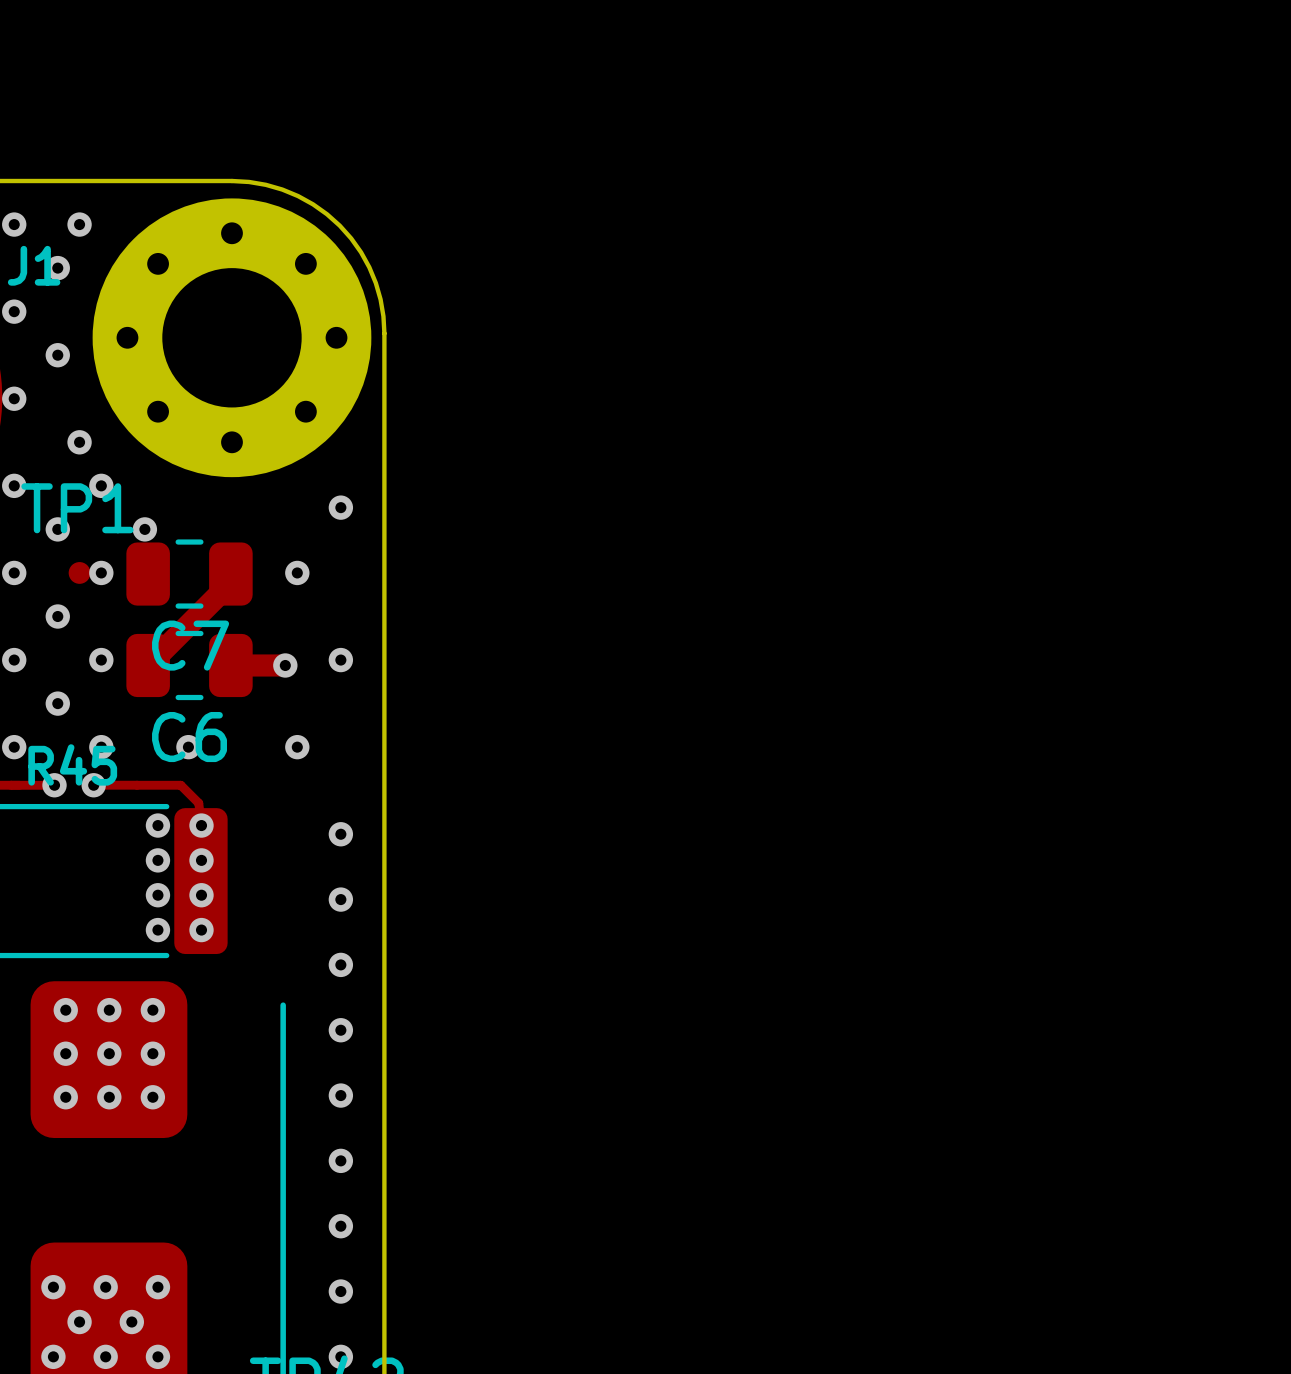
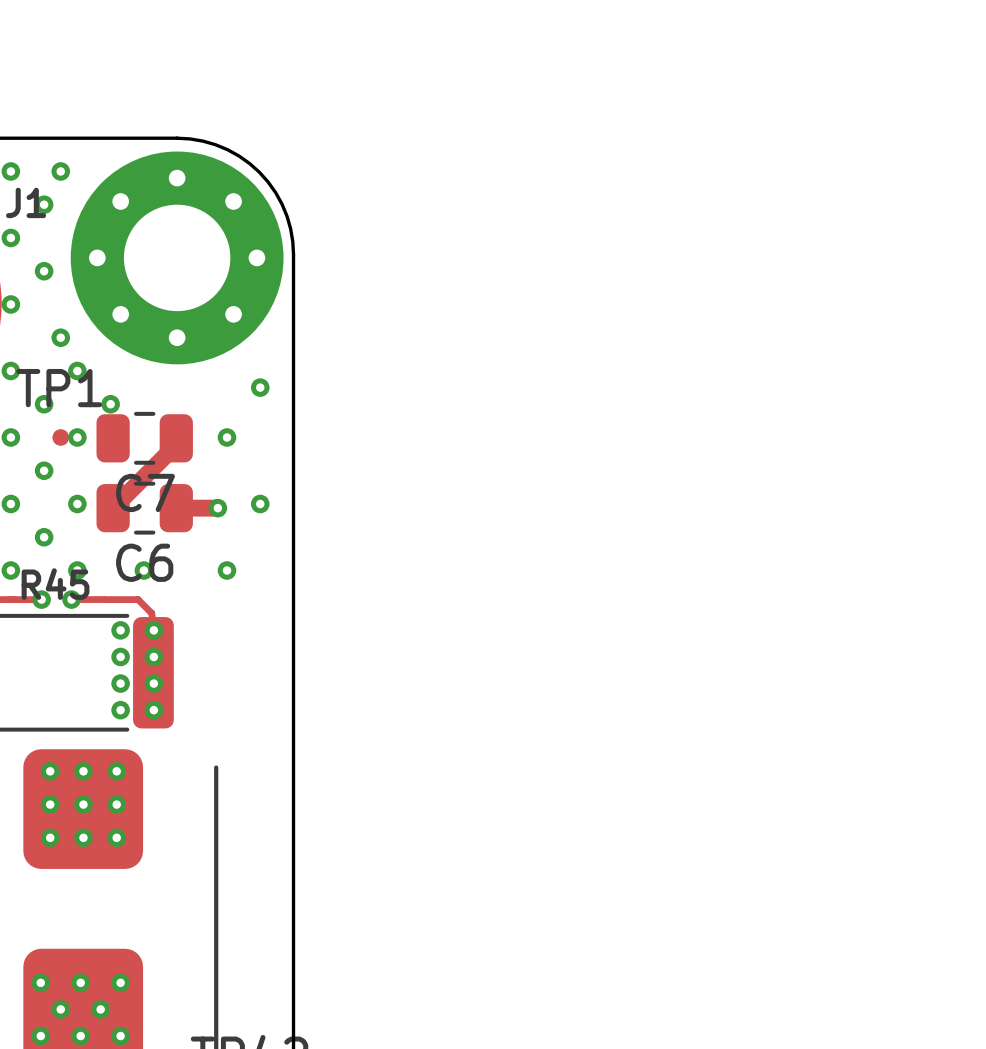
via: (340, 834) -> none
via: (340, 899) -> none
via: (340, 964) -> none
via: (340, 1030) -> none
via: (340, 1095) -> none
via: (340, 1160) -> none
via: (340, 1226) -> none
via: (340, 1291) -> none
via: (340, 1356) -> none

